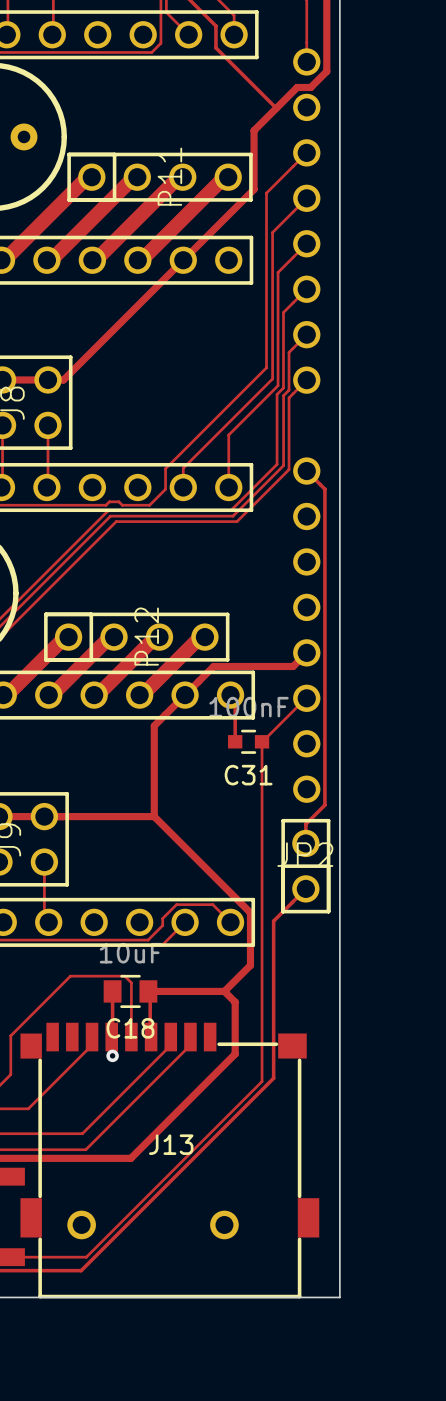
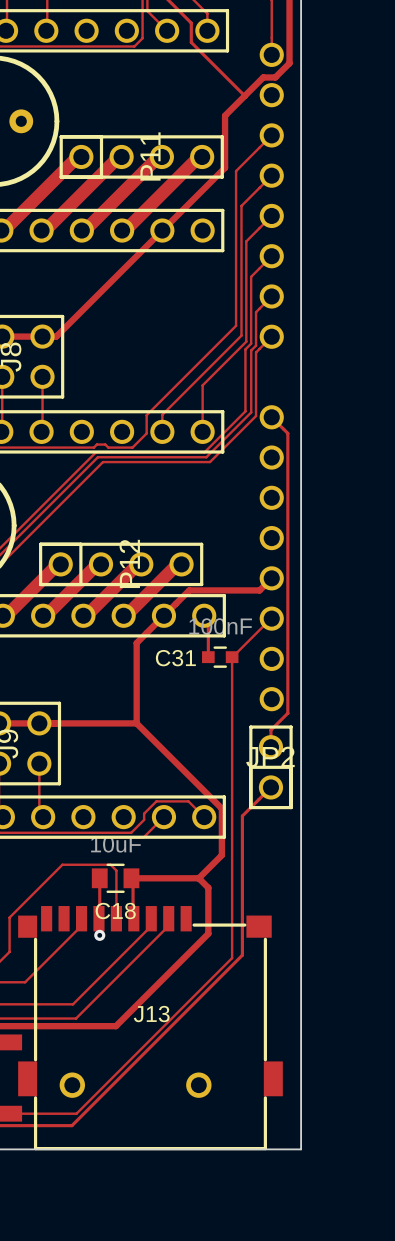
C31 name position: C31 (248, 775) -> C31 (175, 658)

